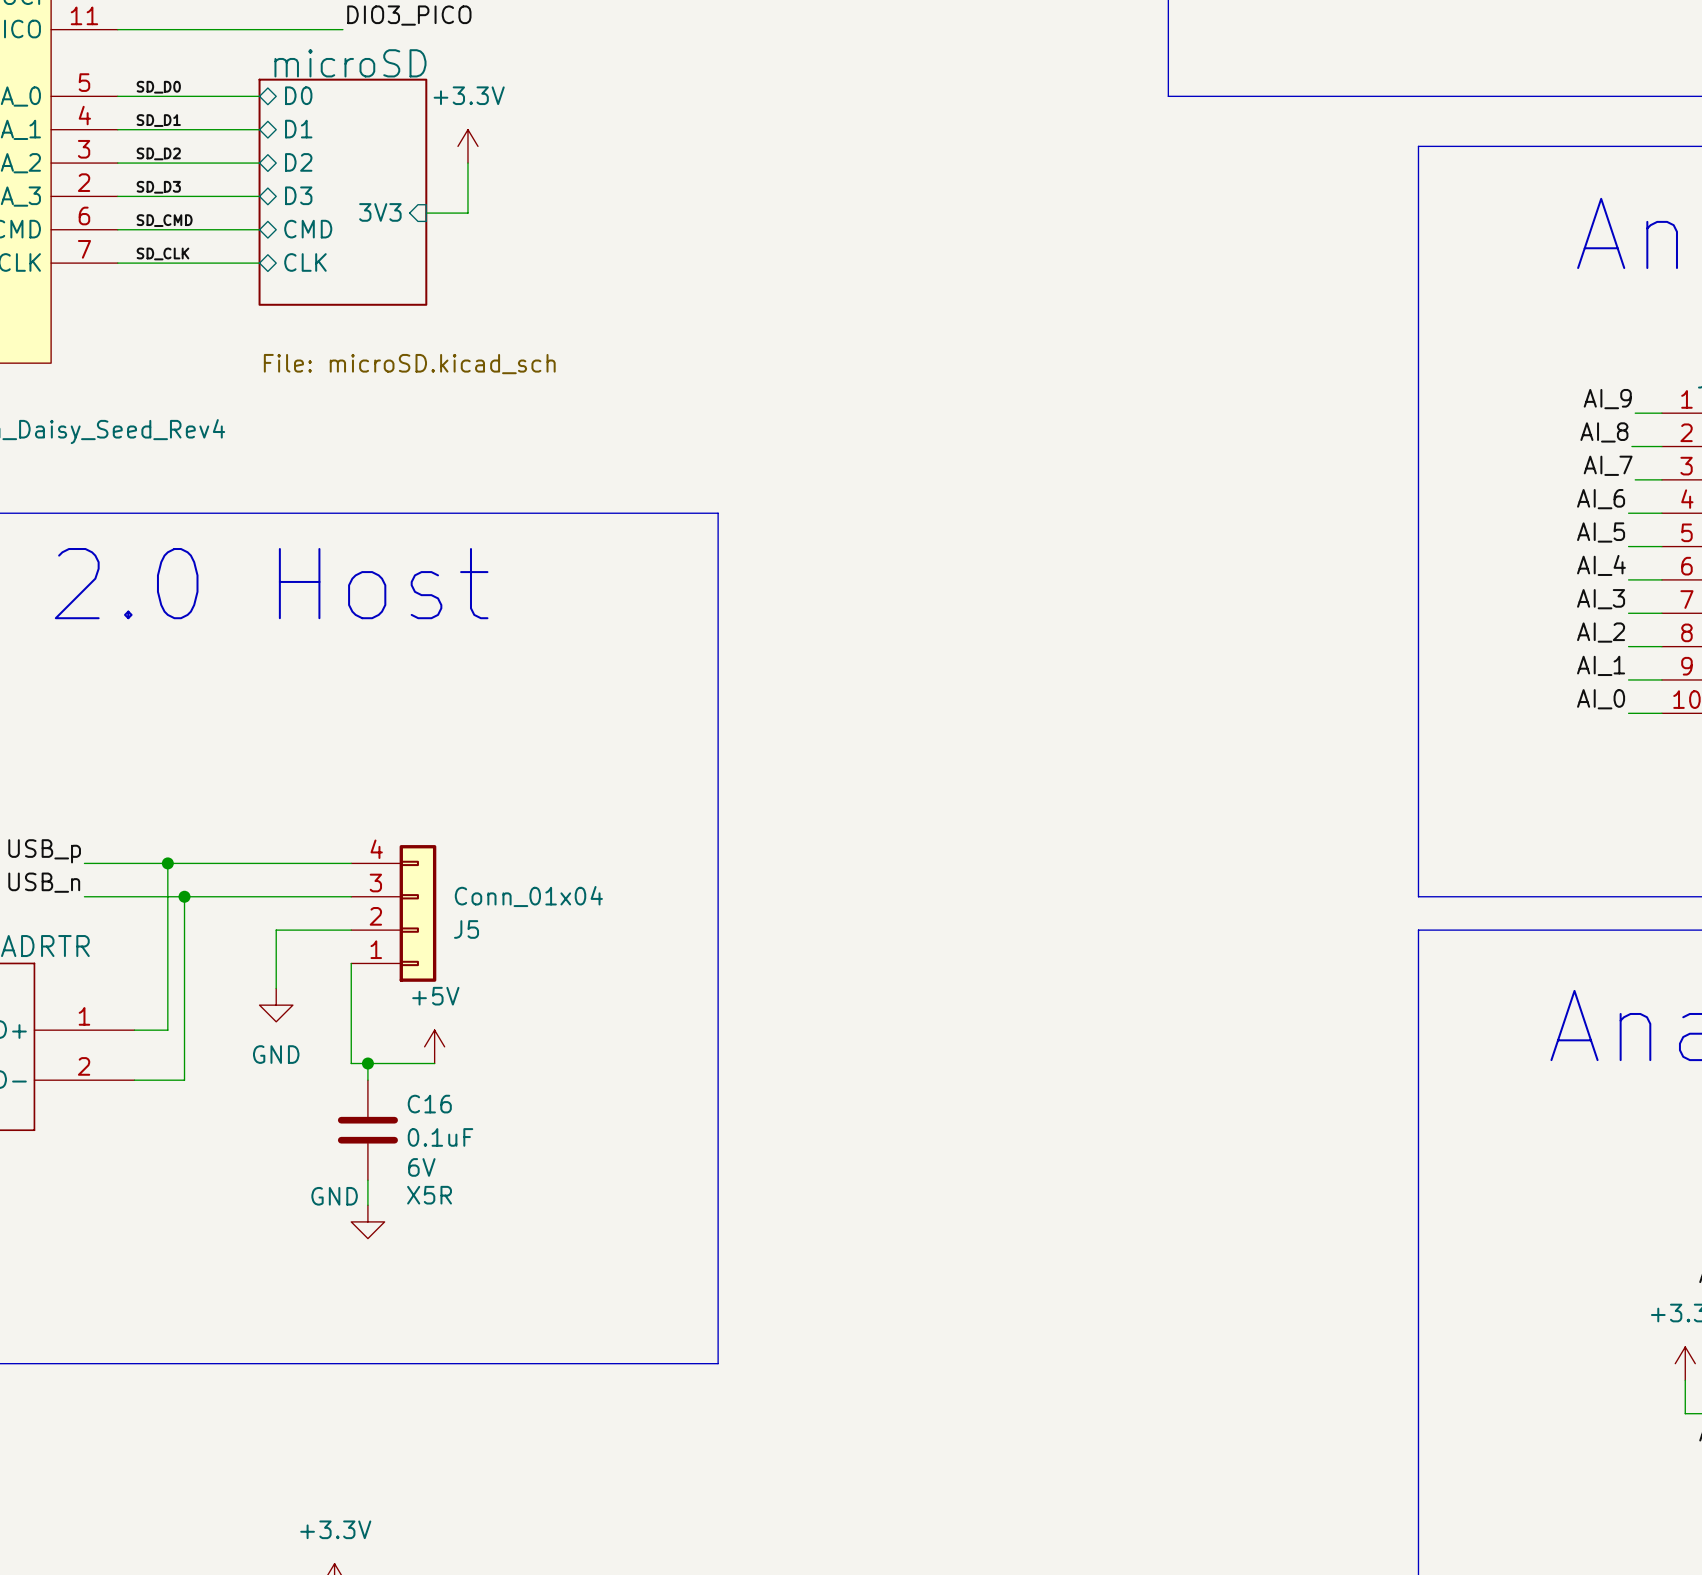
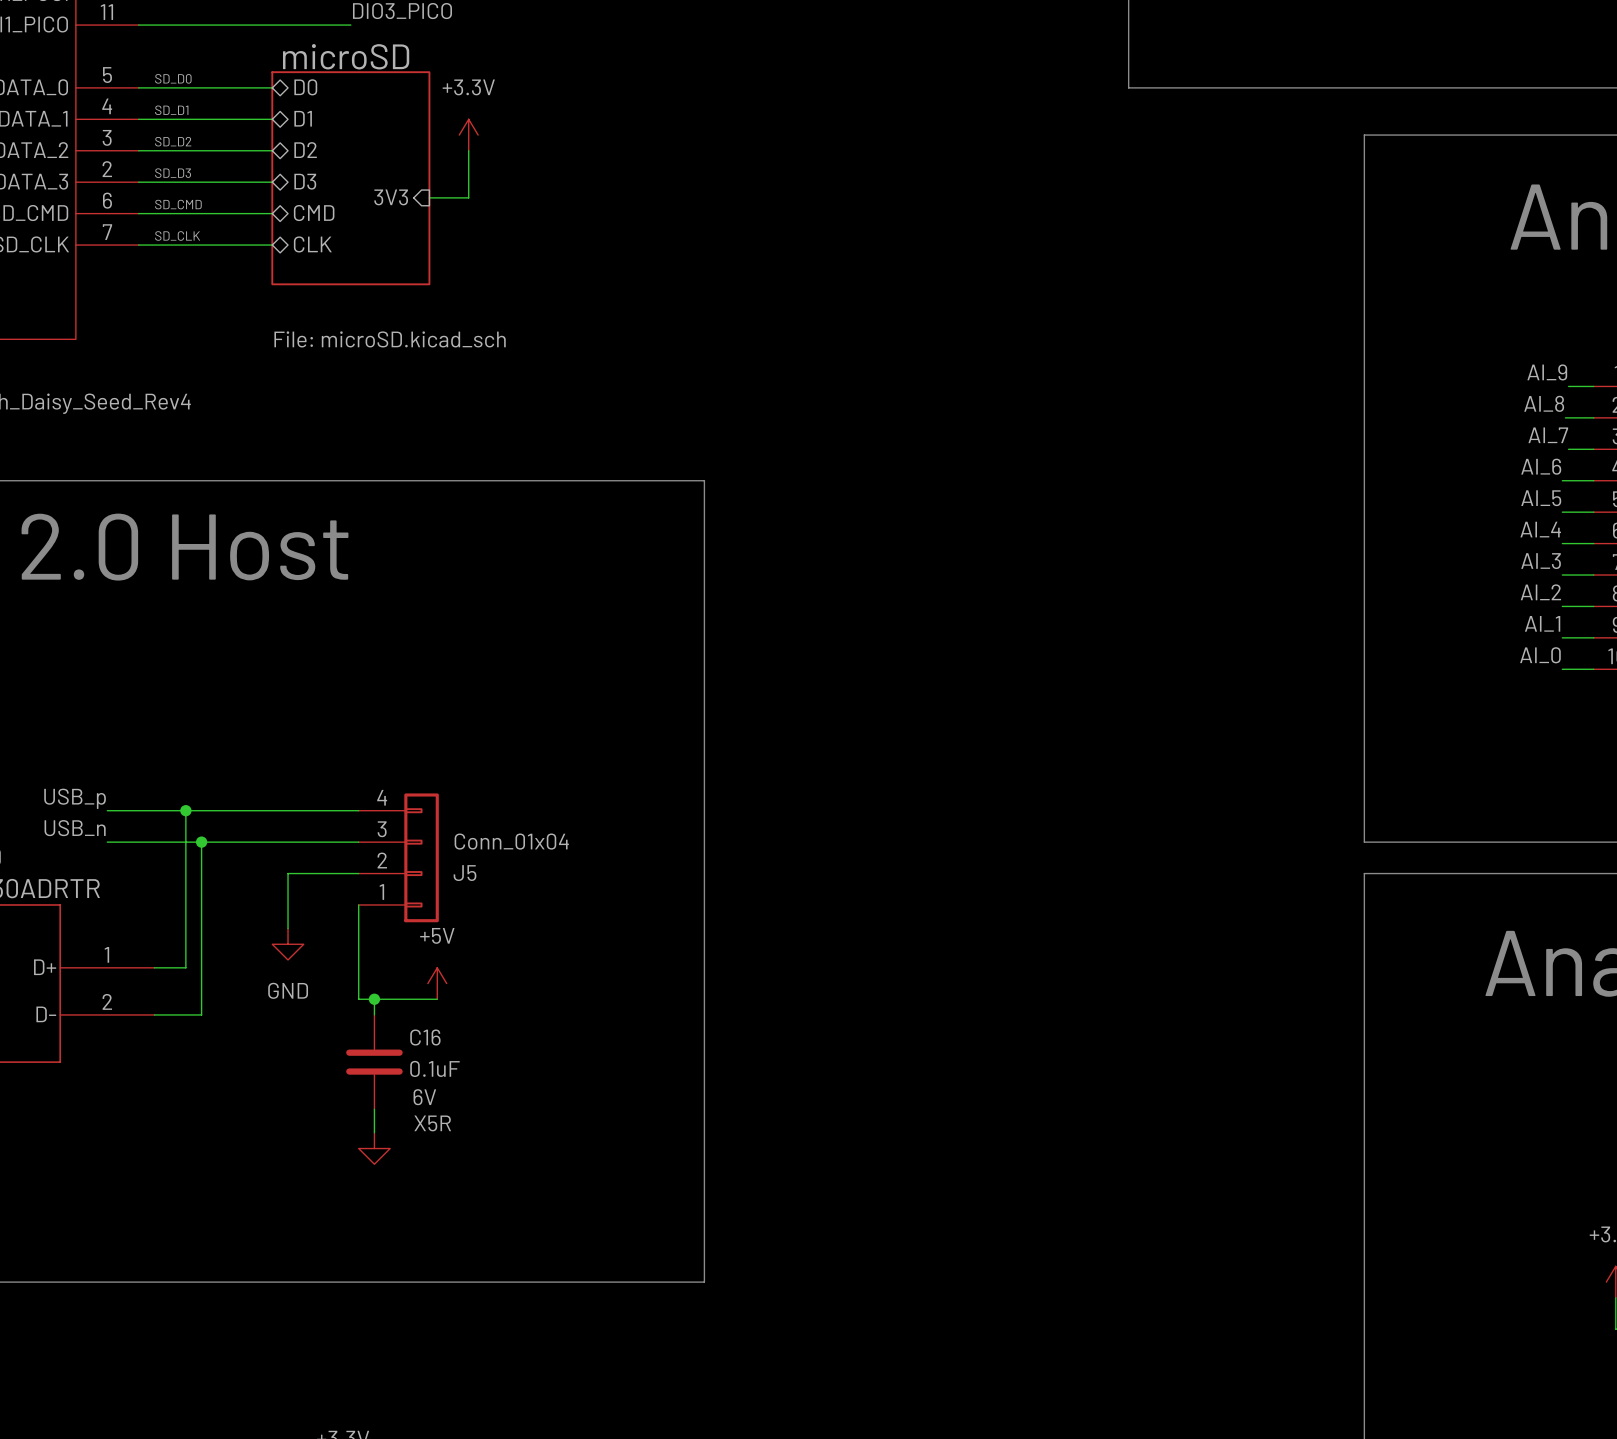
power symbol text: GND (334, 1196) -> none

